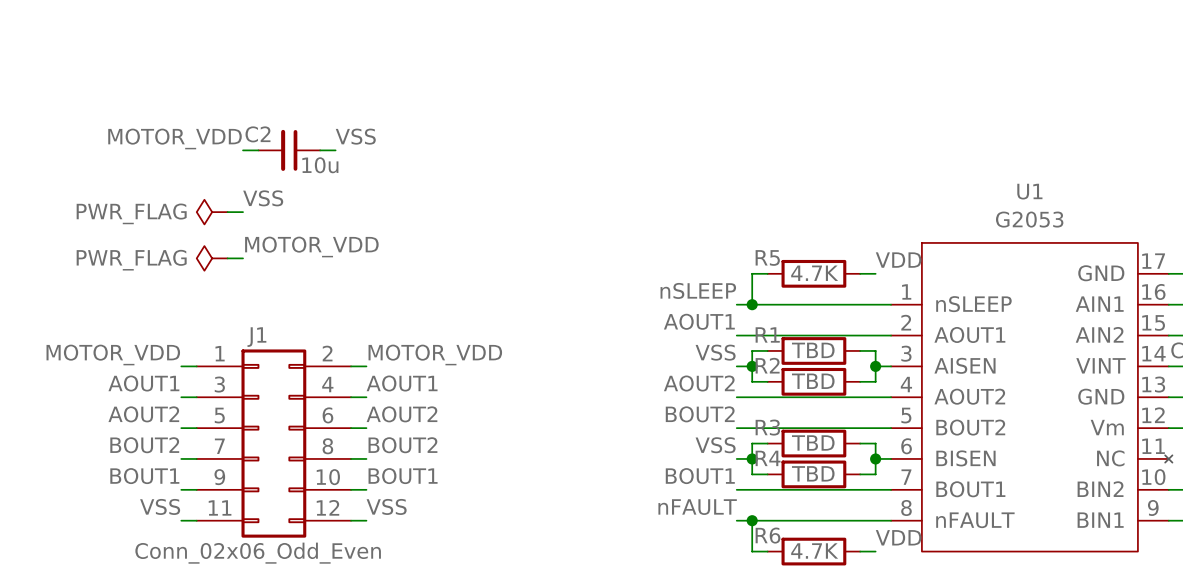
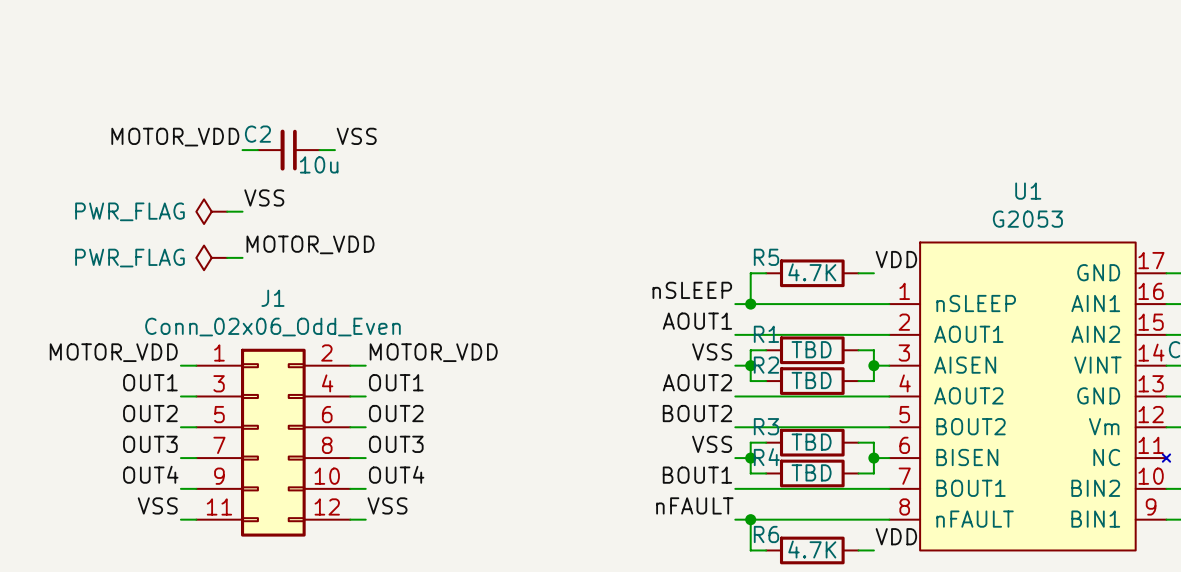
J1 name position: J1 (256, 337) -> J1 (272, 298)
label: AOUT1 (143, 383) -> OUT1 (150, 382)
label: AOUT1 (402, 383) -> OUT1 (396, 382)
label: AOUT2 (143, 414) -> OUT2 (150, 413)
label: AOUT2 (401, 414) -> OUT2 (396, 413)
label: BOUT2 (144, 445) -> OUT3 (150, 444)
label: BOUT2 (402, 445) -> OUT3 (396, 444)
label: BOUT1 (144, 476) -> OUT4 (150, 474)
label: BOUT1 (403, 476) -> OUT4 (396, 474)
J1 value position: Conn_02x06_Odd_Even (258, 553) -> Conn_02x06_Odd_Even (272, 327)

